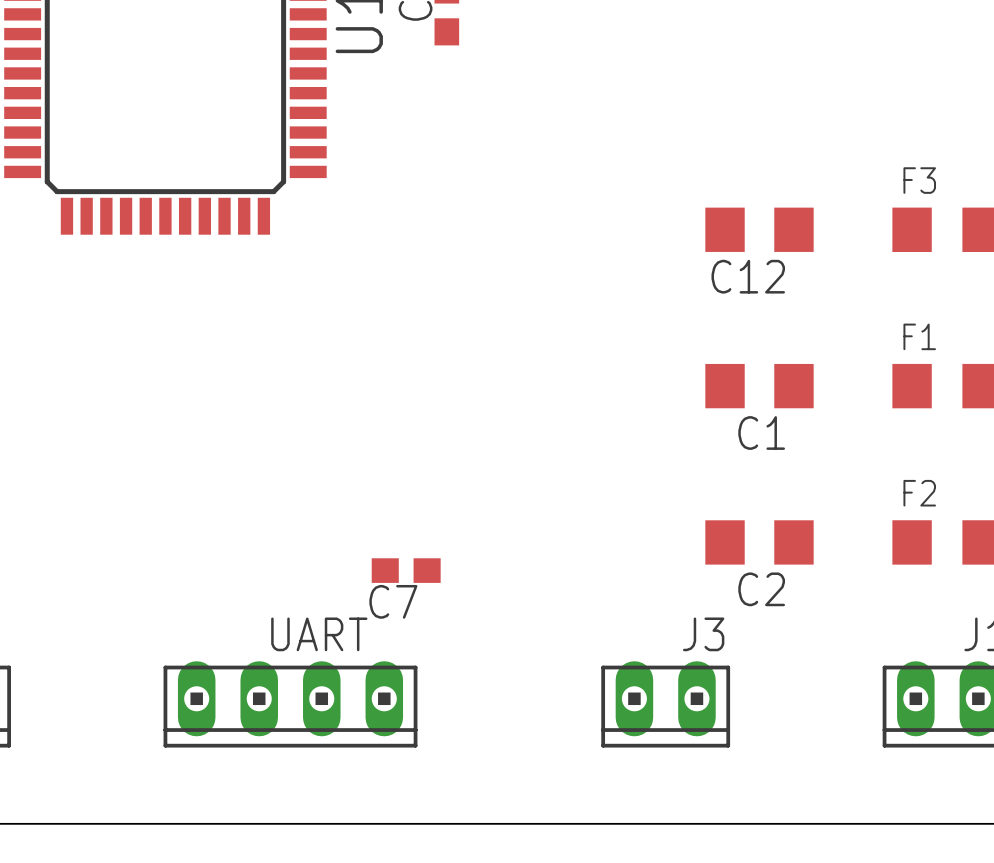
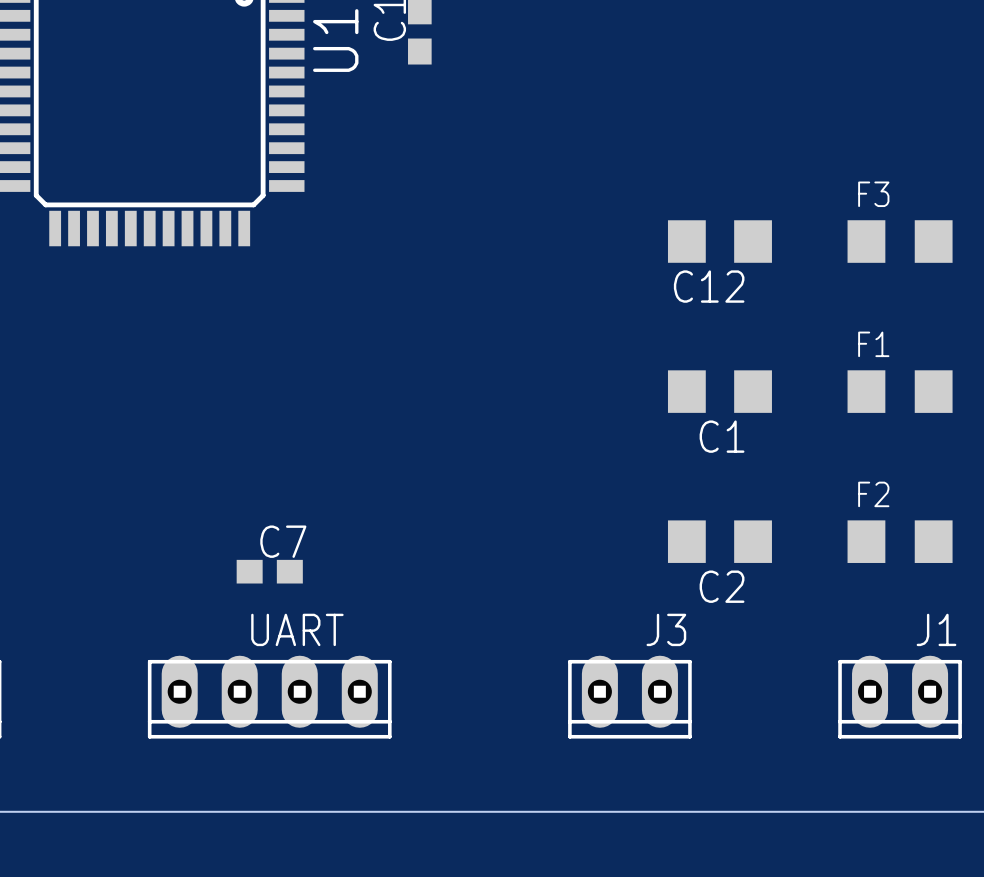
C7 position: (406, 570) -> (269, 571)
C7 name position: C7 (393, 601) -> C7 (283, 541)

